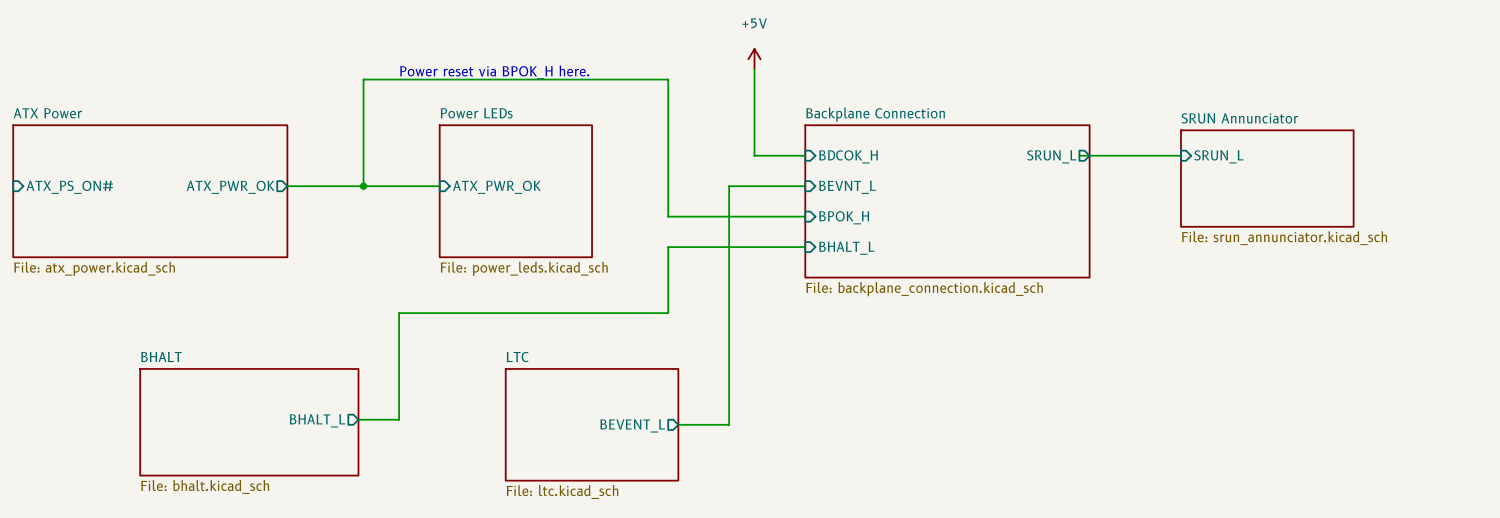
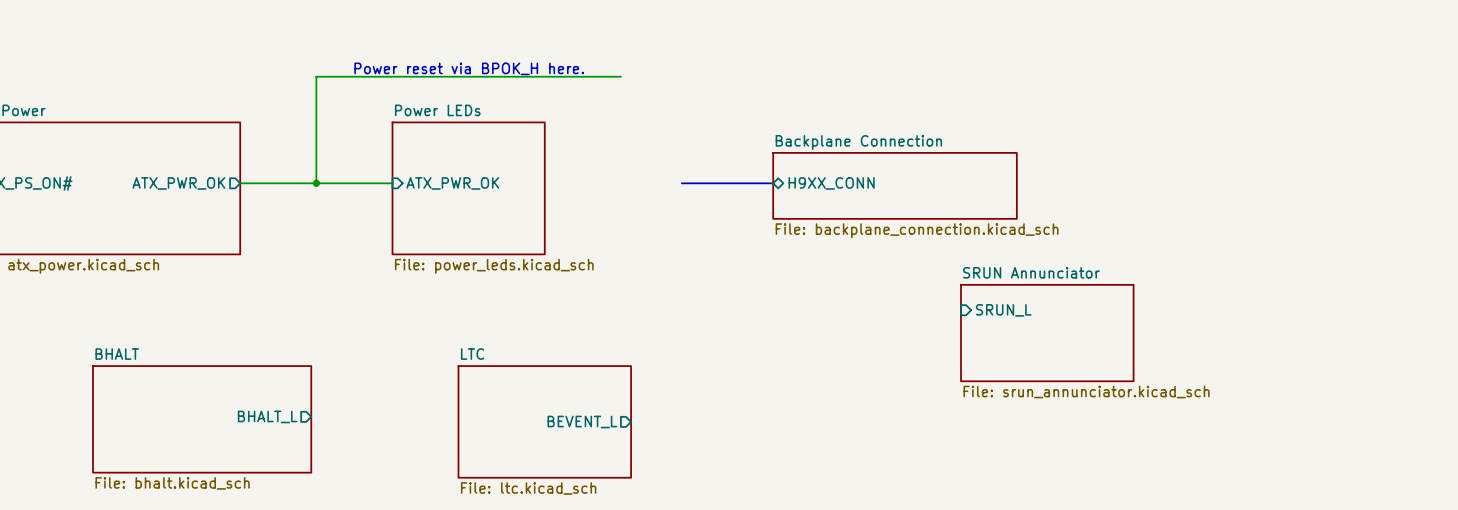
power symbol: +5V (754, 59) -> none
wire: (754, 69) (754, 155) (805, 155) -> none
wire: (668, 79) (668, 216) (805, 216) -> none
wire: (1079, 155) (1180, 155) -> none
sheet pin: BDCOK_H (848, 156) -> none
sheet pin: SRUN_L (1051, 156) -> none
sheet pin: SRUN_L (1219, 156) -> none
sheet SRUN Annunciator: File: srun_annunciator.kicad_sch (1267, 178) -> none
bus: none -> (681, 183) (773, 183)
wire: (805, 186) (729, 186) (729, 424) (678, 424) -> none
sheet pin: BEVNT_L (847, 187) -> none
sheet pin: none -> H9XX_CONN (831, 183)
sheet Backplane Connection: none -> File: backplane_connection.kicad_sch (895, 185)
sheet Backplane Connection: File: backplane_connection.kicad_sch (947, 201) -> none
sheet pin: BPOK_H (844, 217) -> none
wire: (805, 247) (668, 247) (668, 313) (399, 313) (399, 419) (358, 419) -> none
sheet pin: BHALT_L (846, 248) -> none
sheet pin: none -> SRUN_L (1003, 310)
sheet SRUN Annunciator: none -> File: srun_annunciator.kicad_sch (1047, 333)

